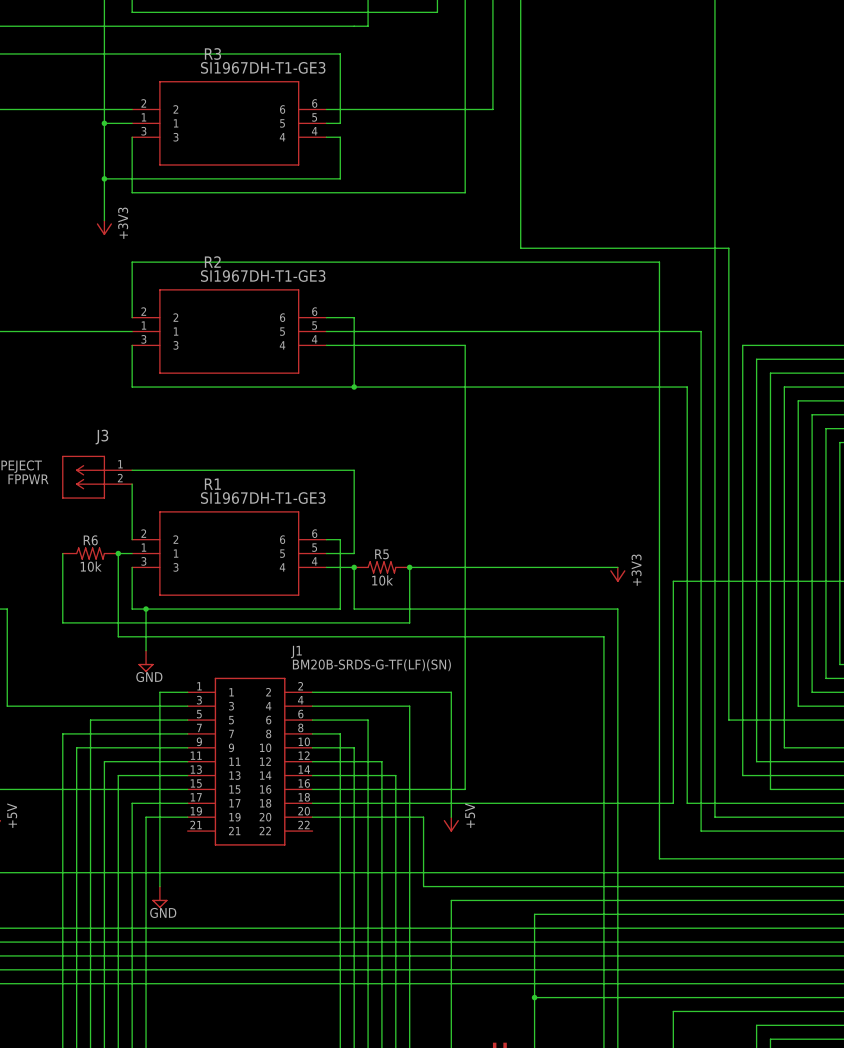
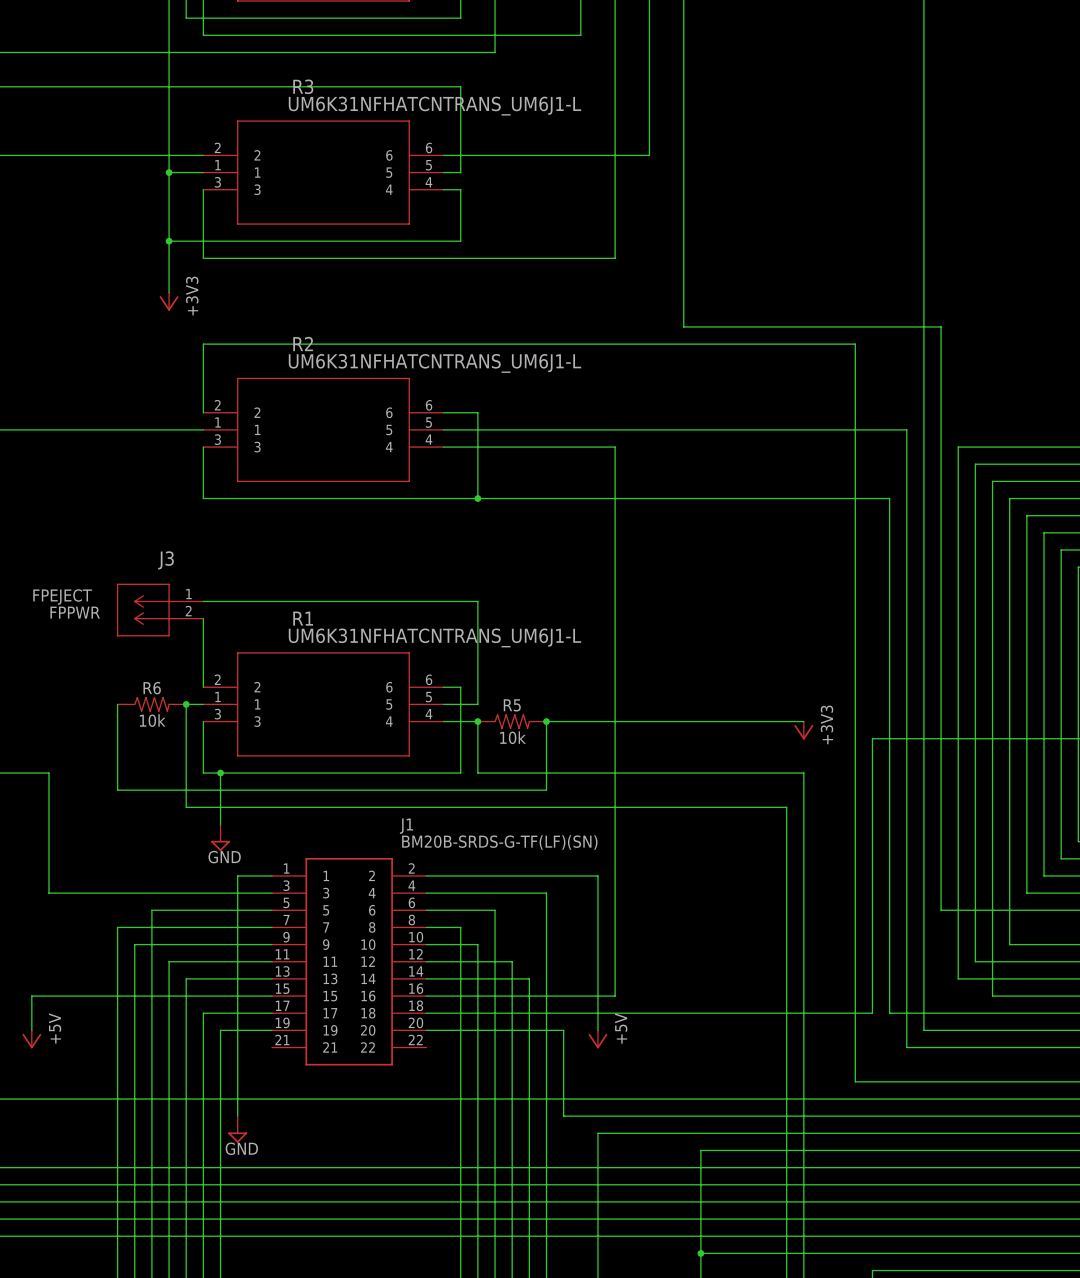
R3 value: SI1967DH-T1-GE3 (263, 67) -> UM6K31NFHATCNTRANS_UM6J1-L (434, 106)
R2 value: SI1967DH-T1-GE3 (263, 276) -> UM6K31NFHATCNTRANS_UM6J1-L (434, 363)
R1 value: SI1967DH-T1-GE3 (263, 498) -> UM6K31NFHATCNTRANS_UM6J1-L (434, 637)

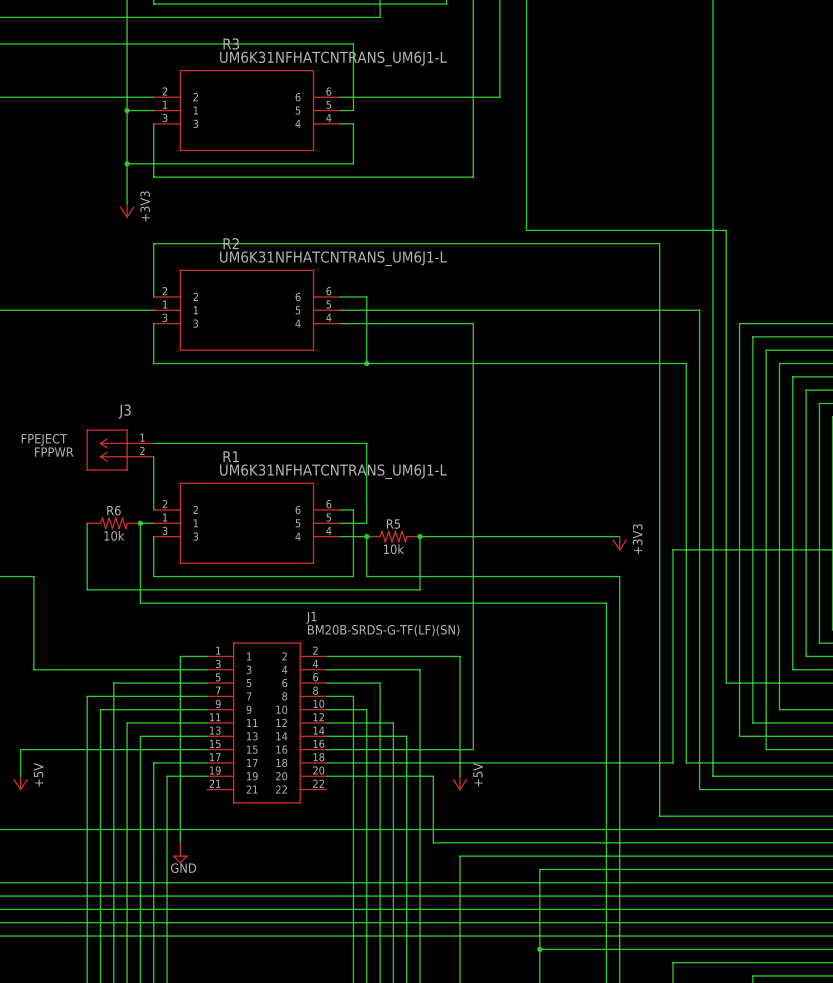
wire: (220, 773) (220, 824) -> none
junction: (220, 773) -> none
power symbol: GND (220, 837) -> none

